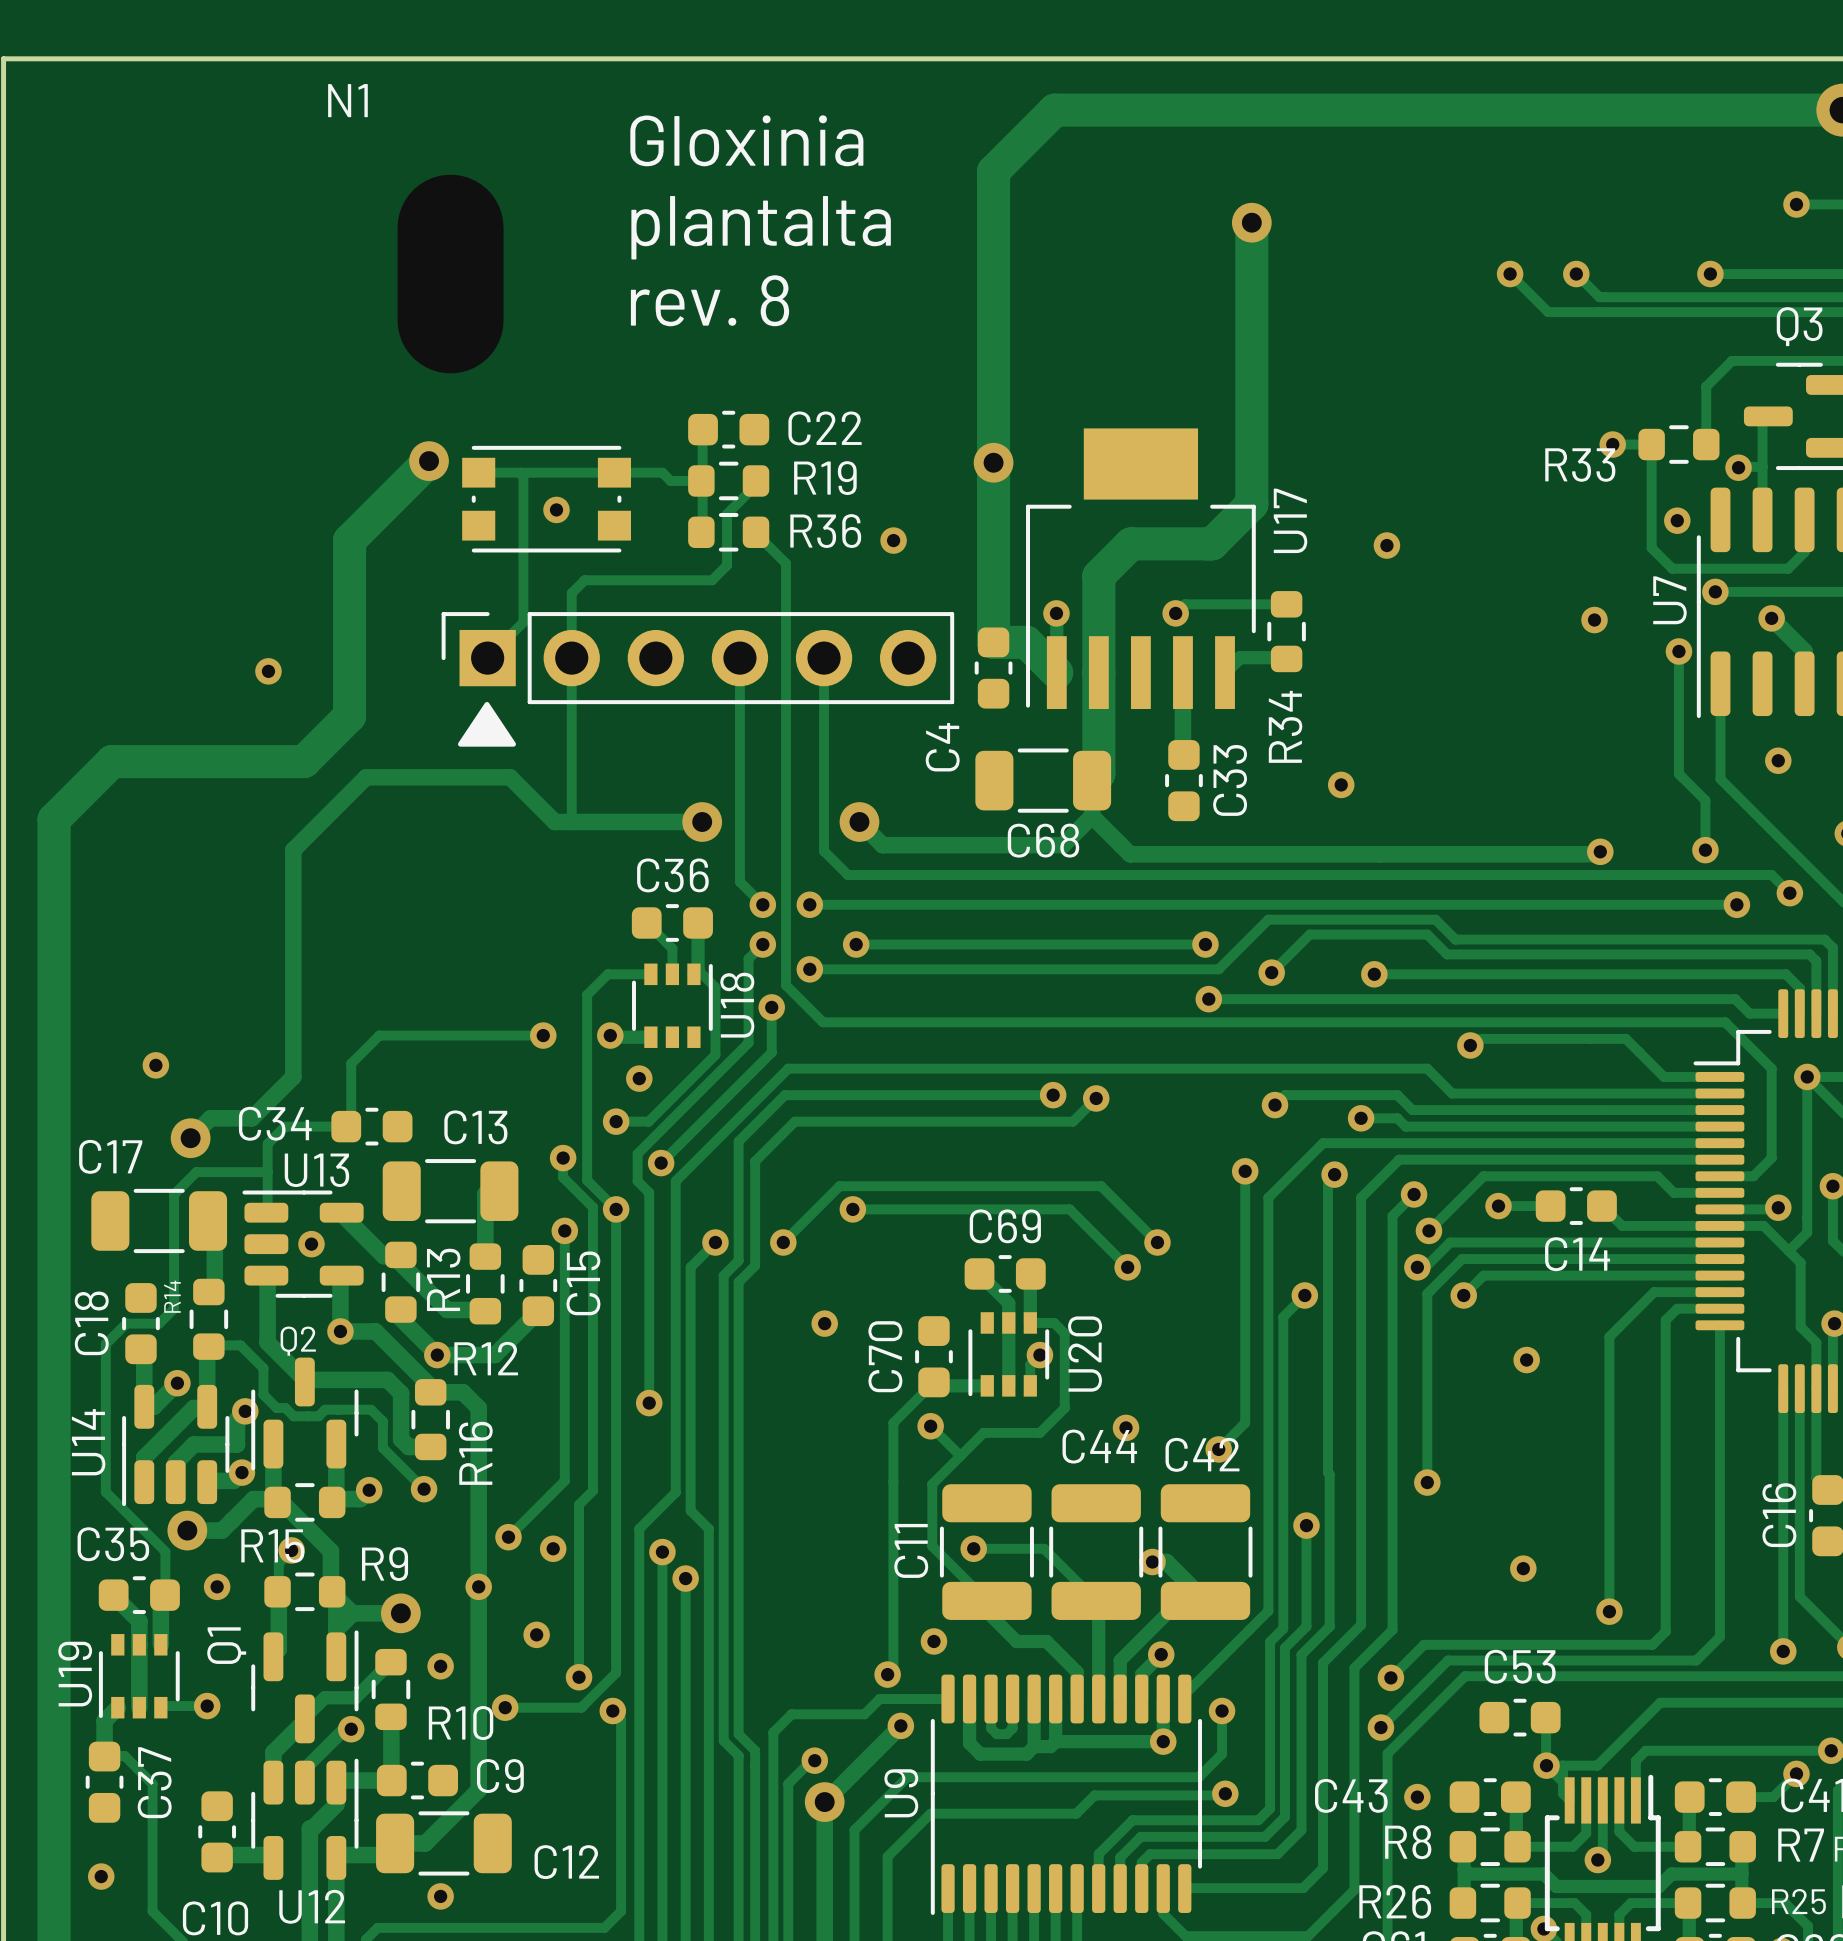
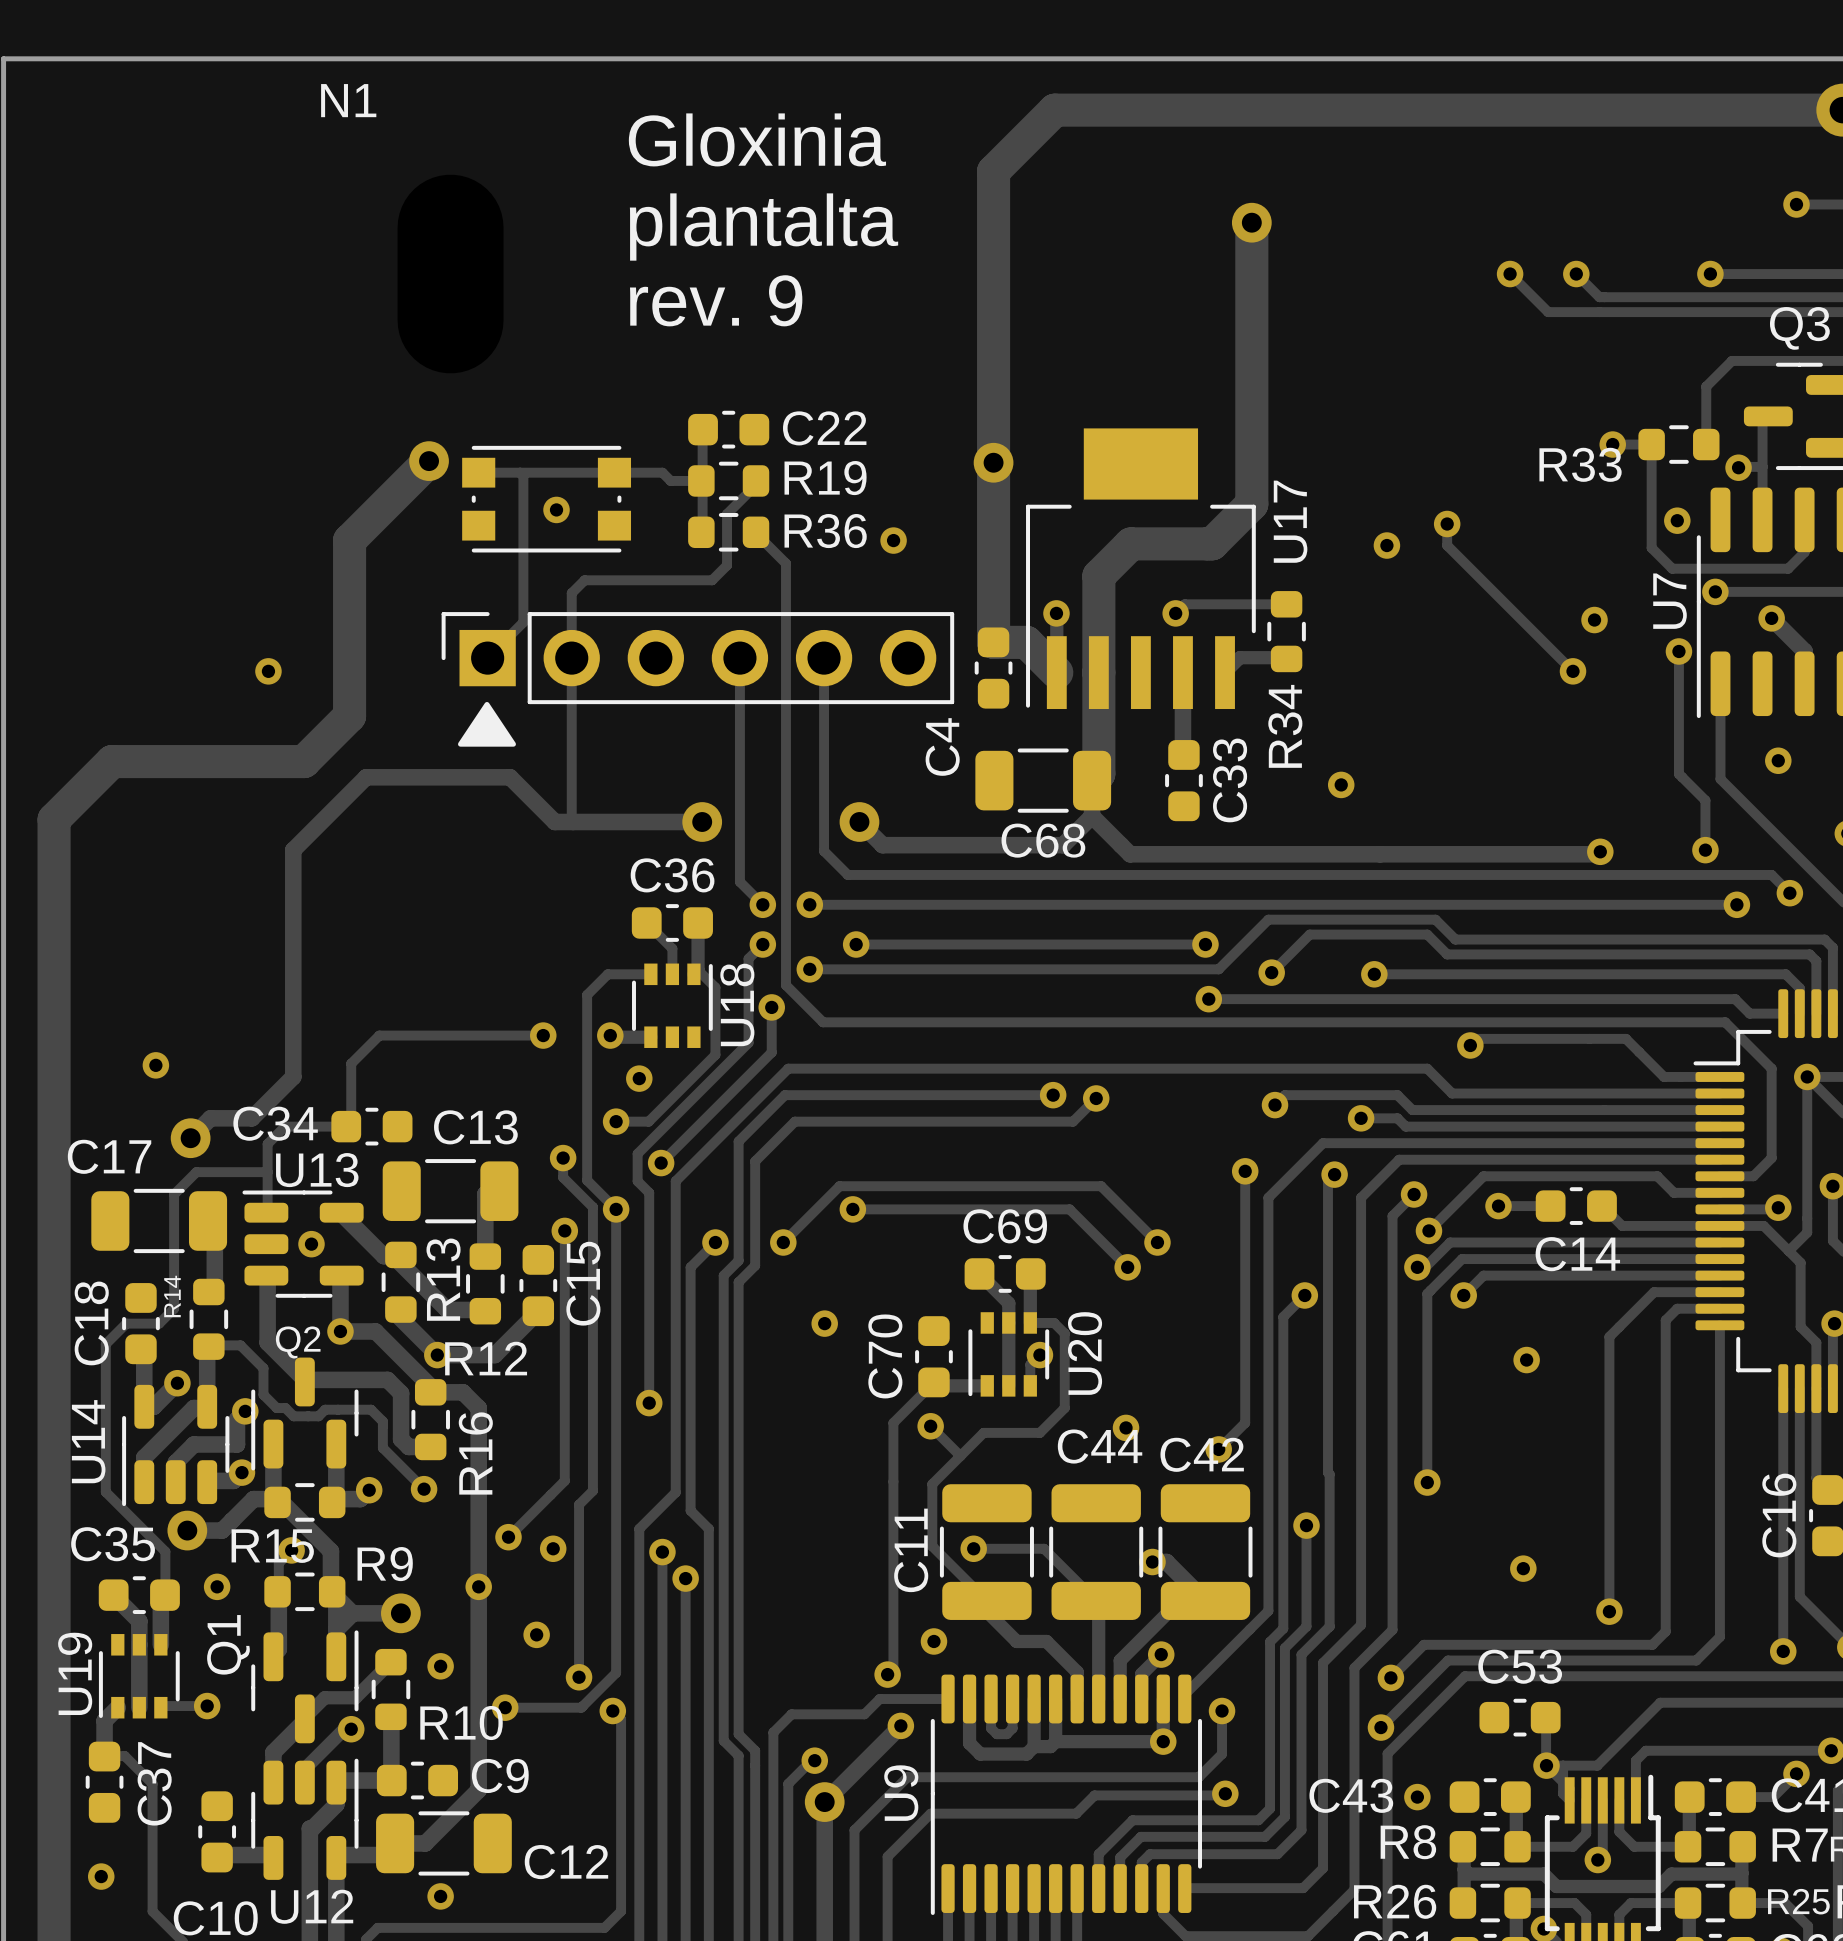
text: rev. 8 (710, 300) -> rev. 9 (716, 300)
track: none -> (1447, 524) (1447, 545) (1573, 671)
via: none -> (1447, 524)
via: none -> (1573, 671)

